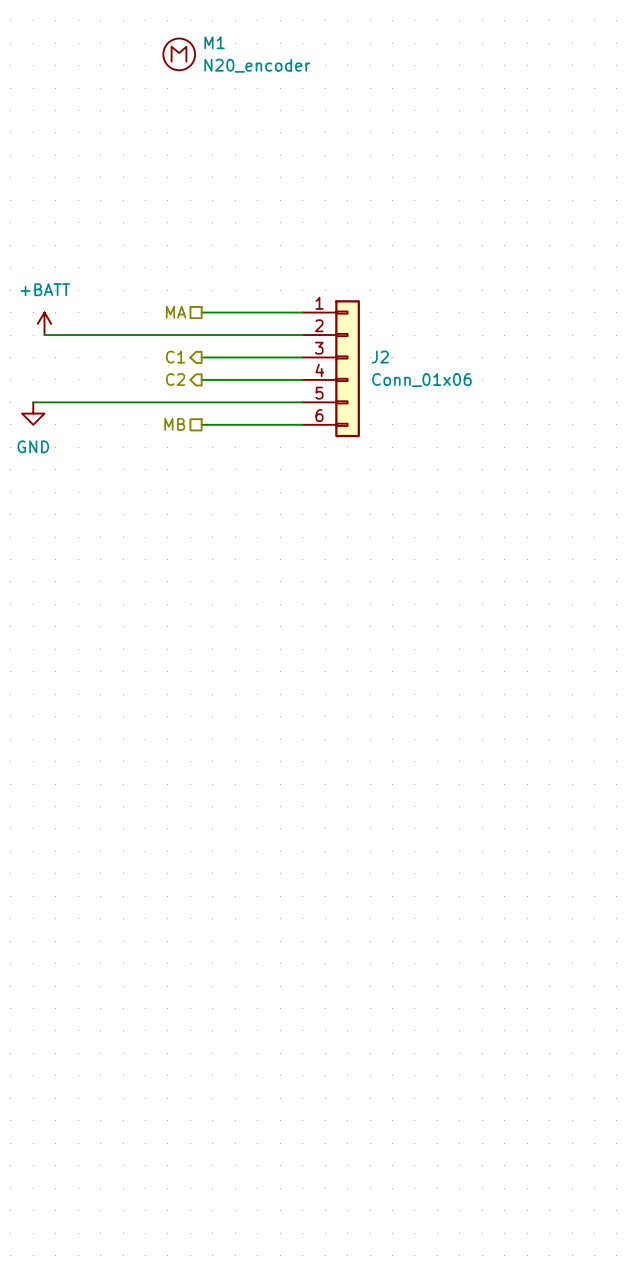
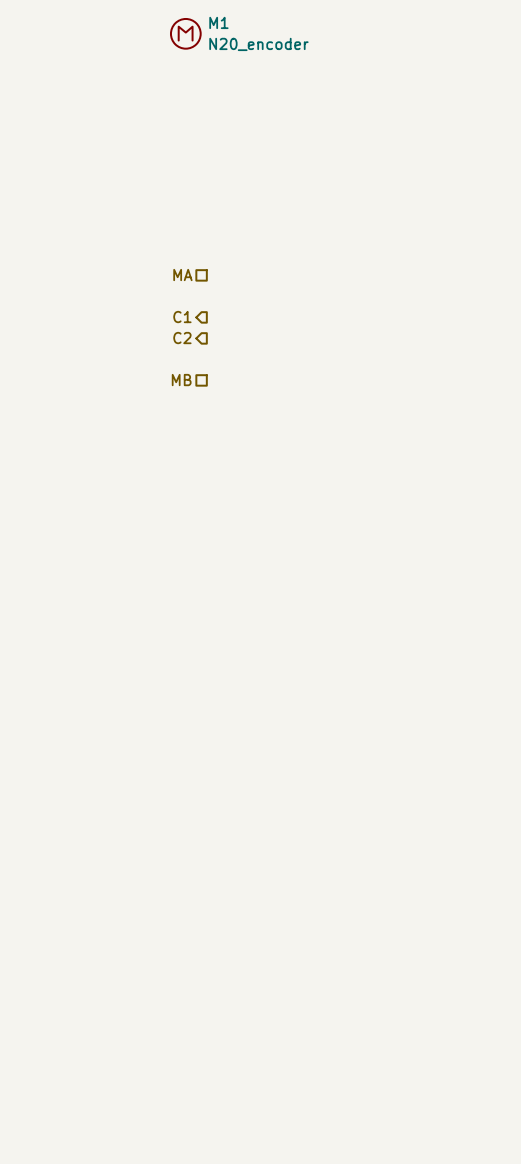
wire: (201, 312) (302, 312) -> none
power symbol: +BATT (44, 323) -> none
wire: (44, 335) (302, 335) -> none
wire: (201, 357) (302, 357) -> none
J2: Conn_01x06 (331, 368) -> none
wire: (201, 379) (302, 379) -> none
wire: (33, 402) (302, 402) -> none
power symbol: GND (33, 413) -> none
wire: (201, 424) (302, 424) -> none

